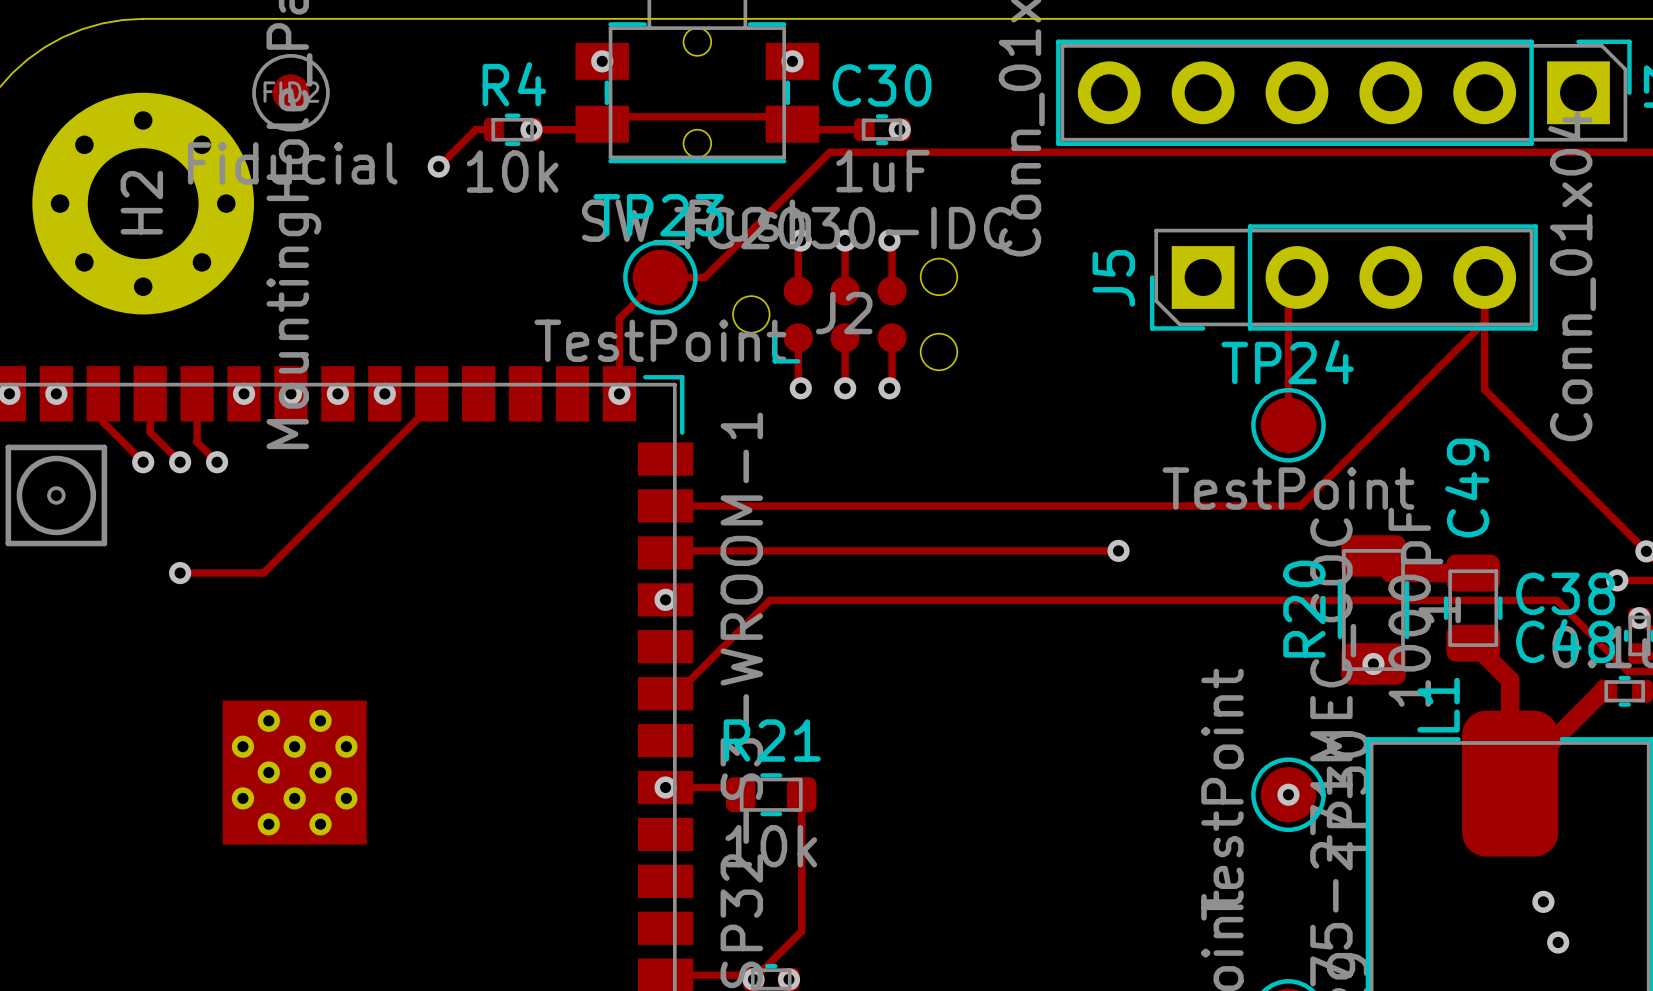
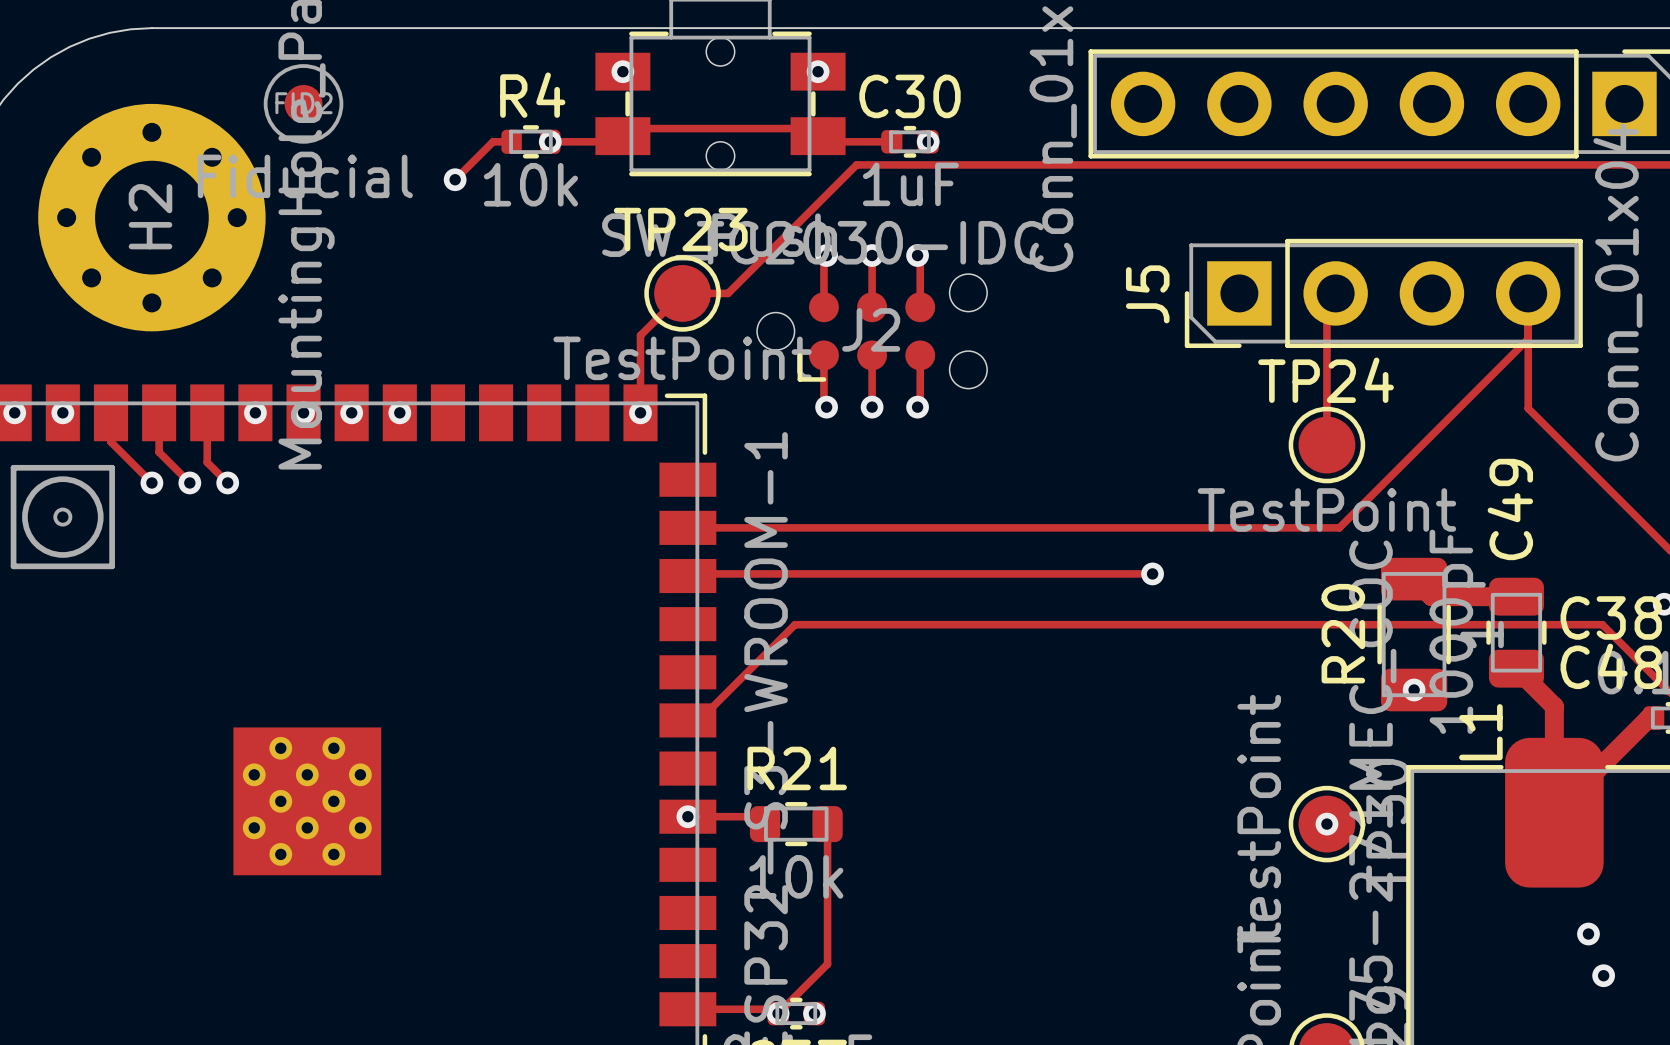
track: (431, 393) (431, 404) (263, 573) (180, 573) -> none
via: (180, 573) -> none
via: (665, 599) -> none

